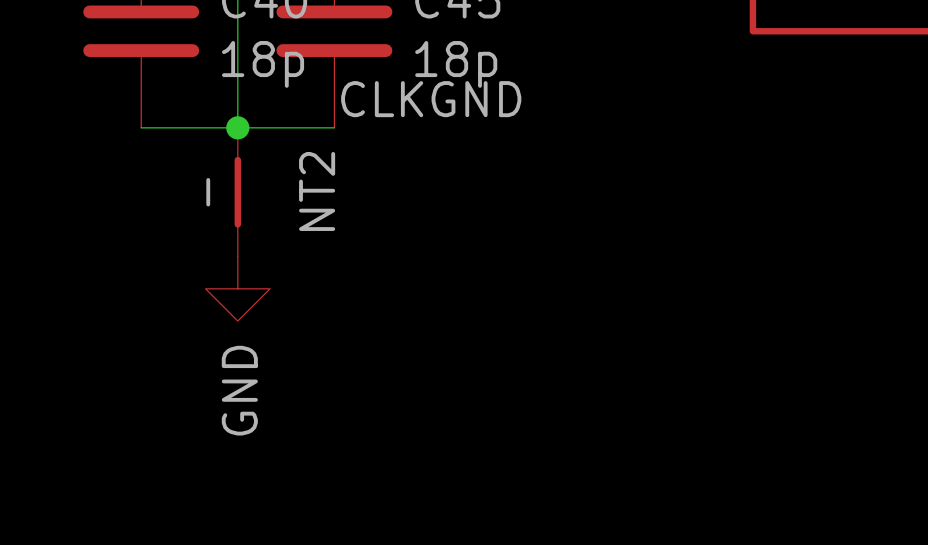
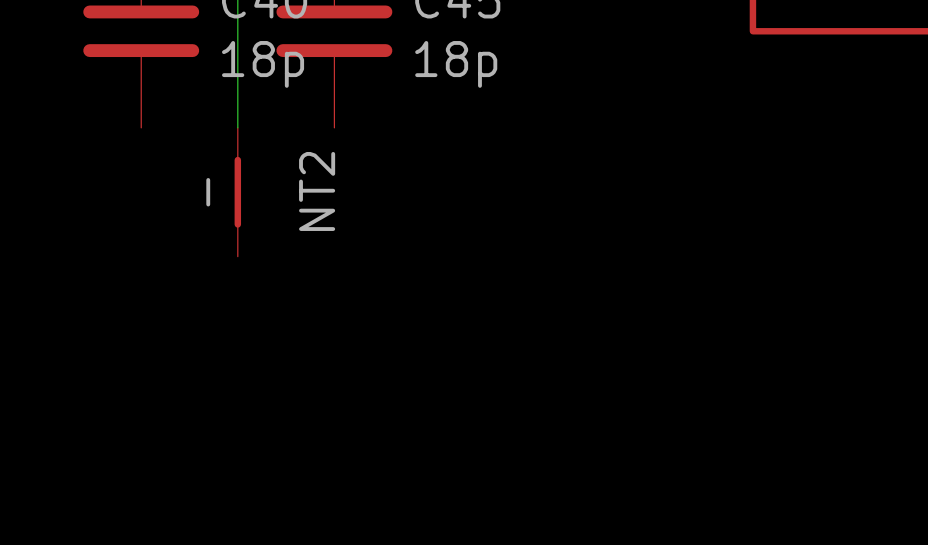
label: CLKGND (431, 99) -> none
wire: (141, 127) (334, 127) -> none
junction: (237, 127) -> none
power symbol: GND (237, 288) -> none

